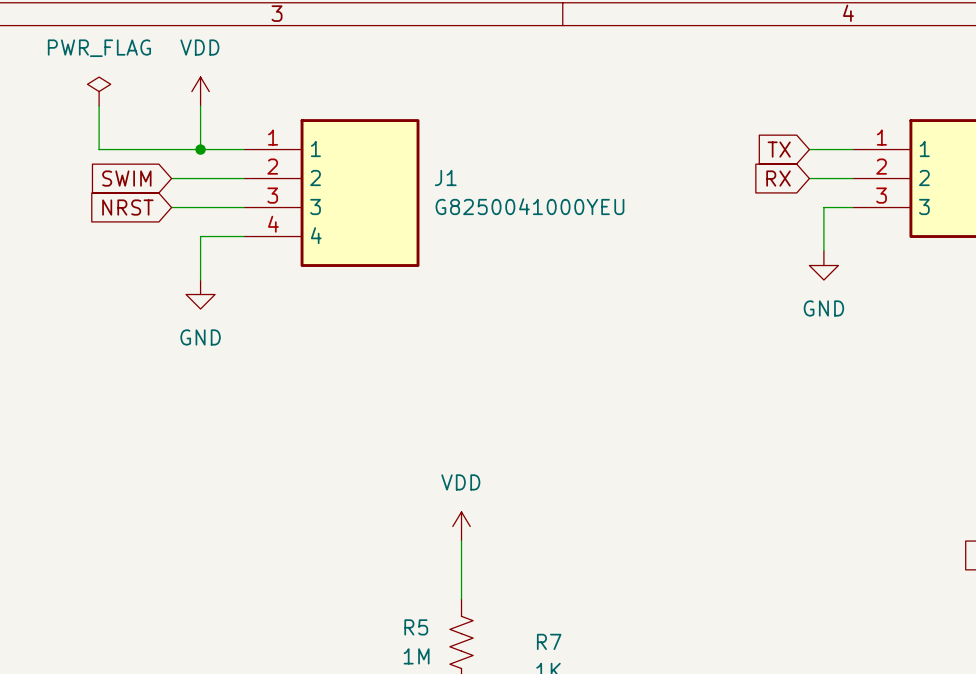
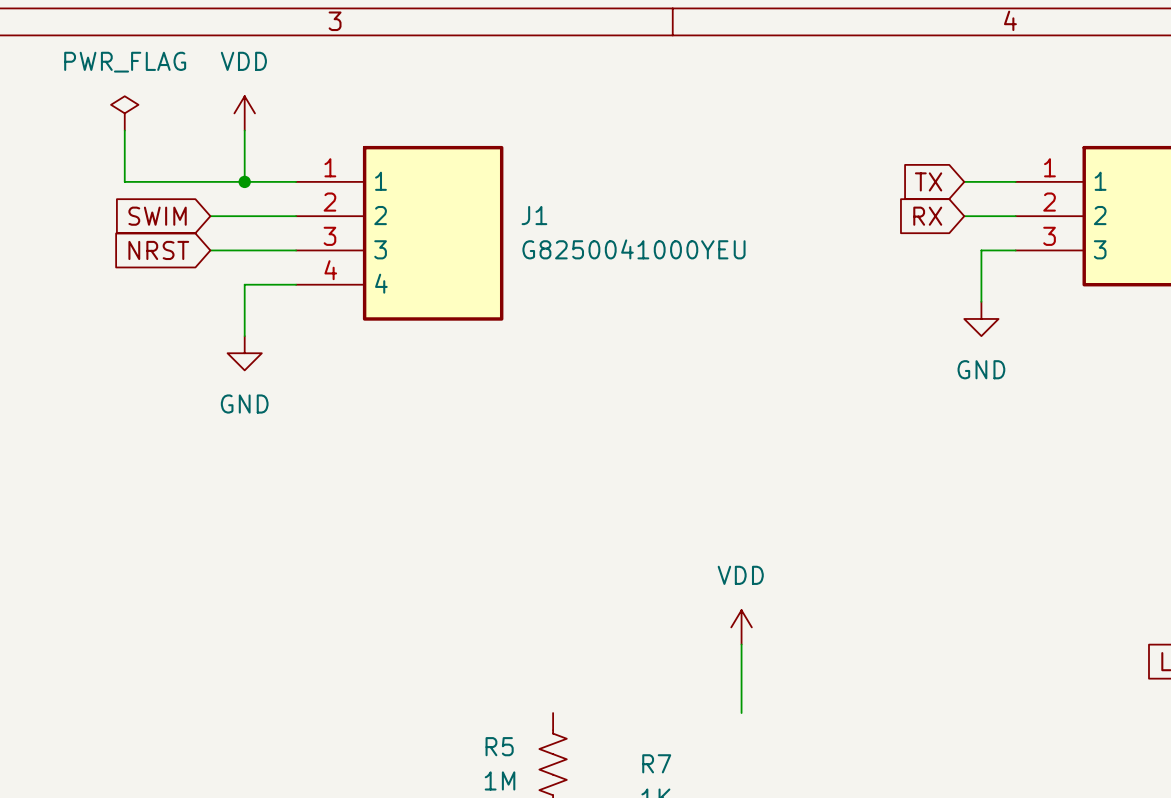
power symbol position: VDD (461, 526) -> VDD (741, 627)
wire: (461, 540) (461, 598) -> (741, 644) (741, 713)

